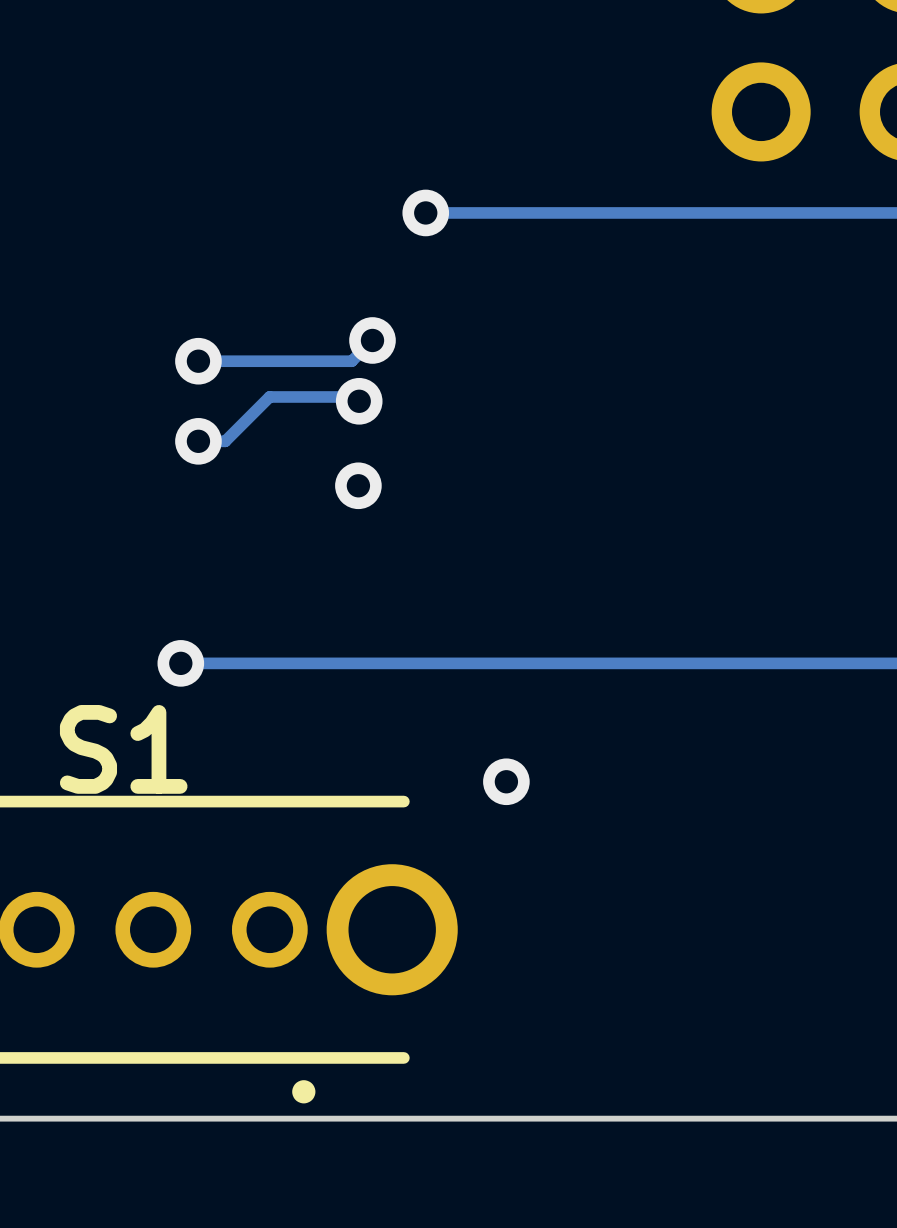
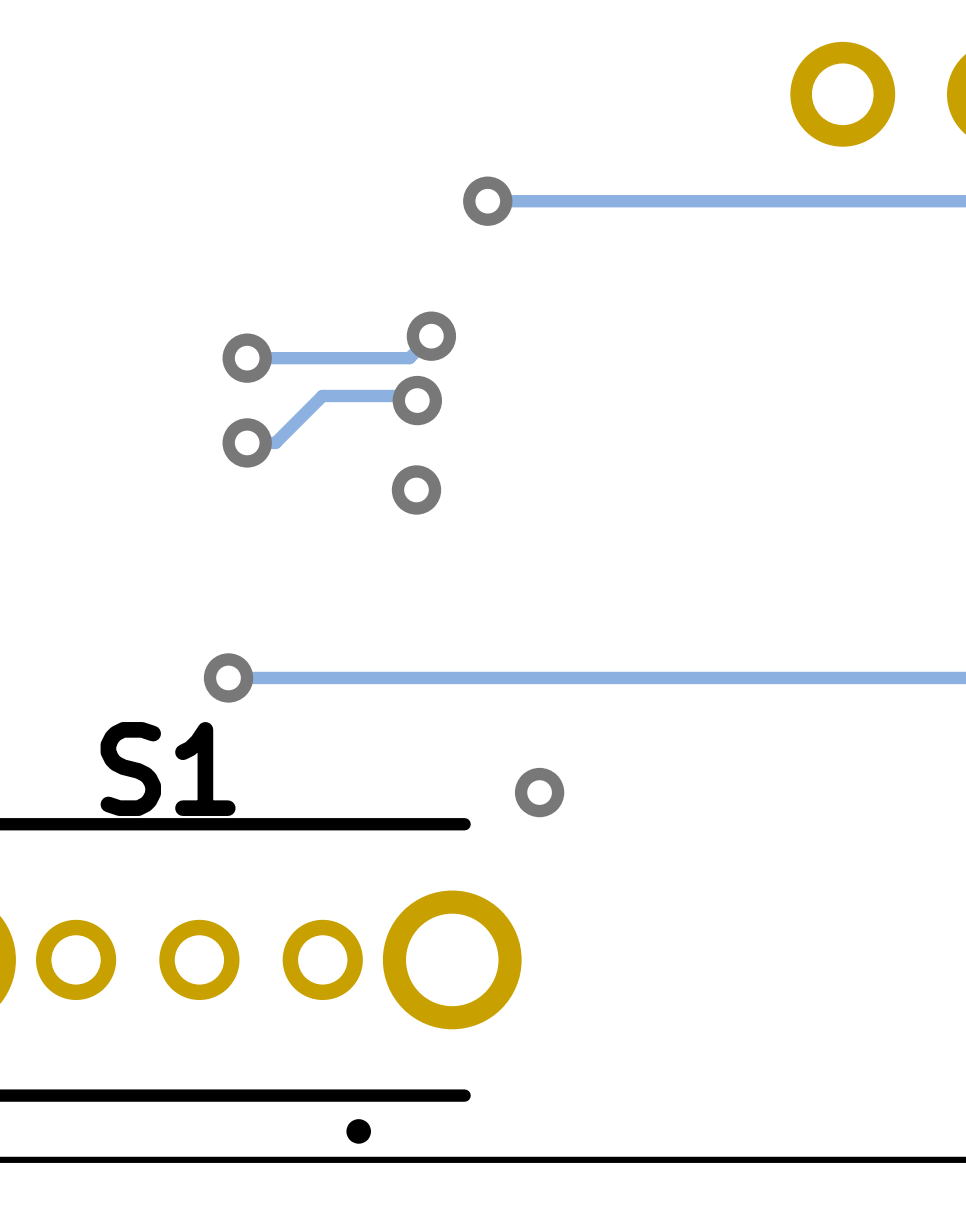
via position: (506, 781) -> (539, 792)

